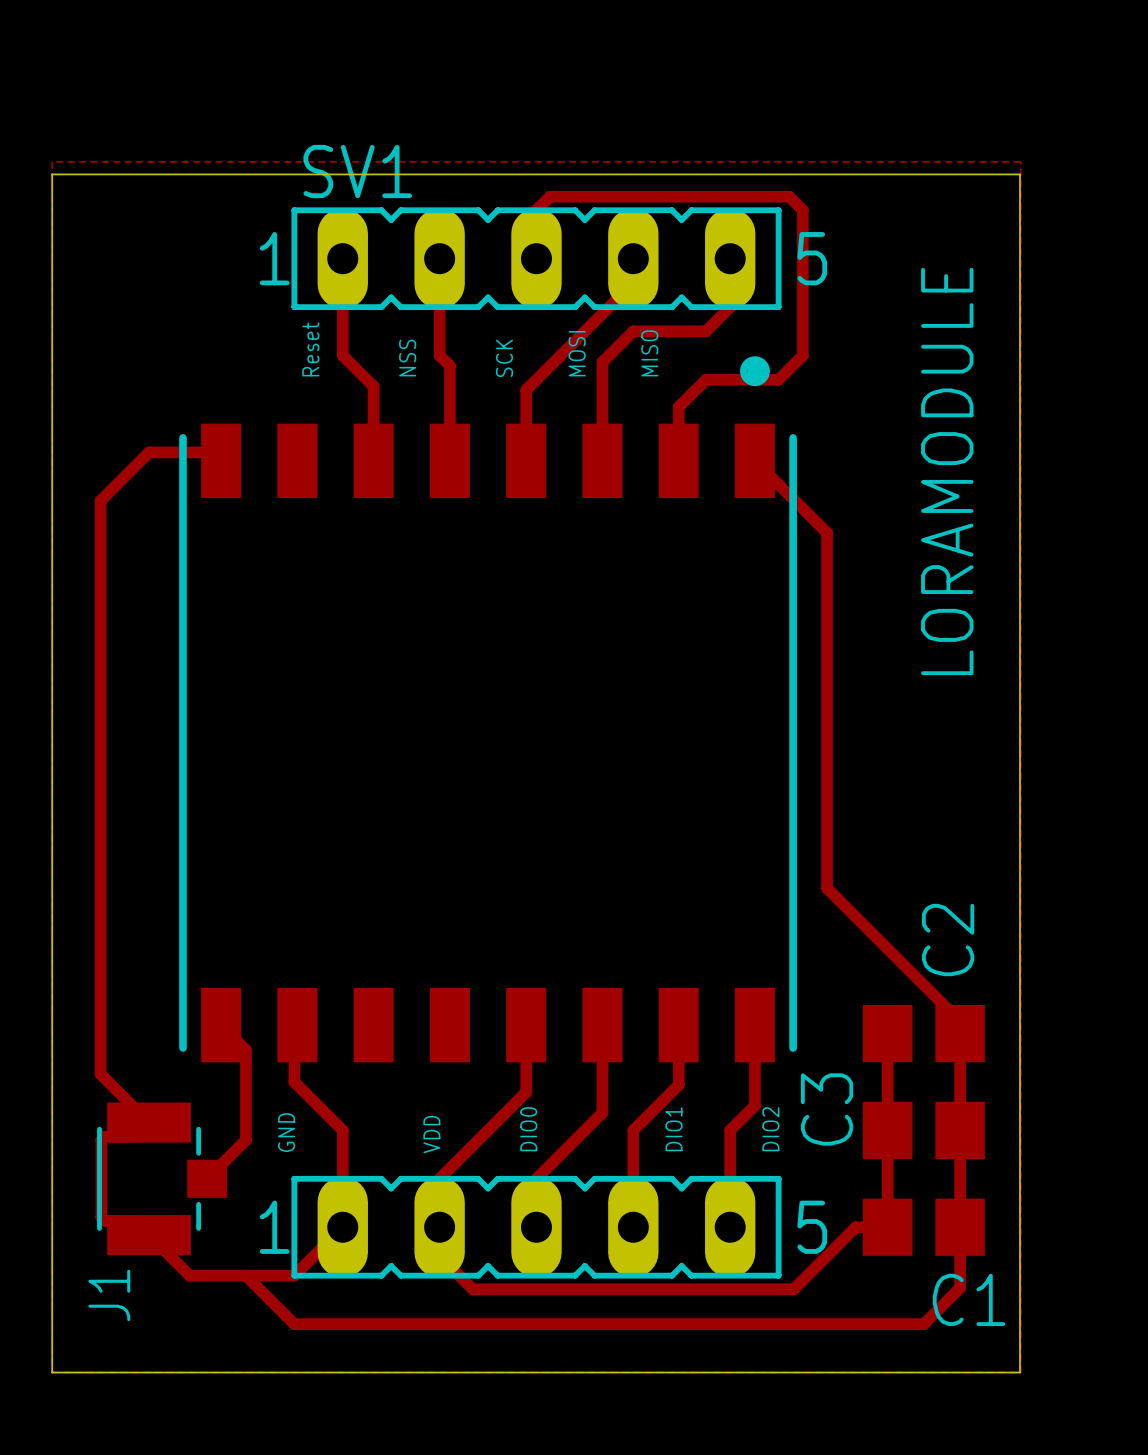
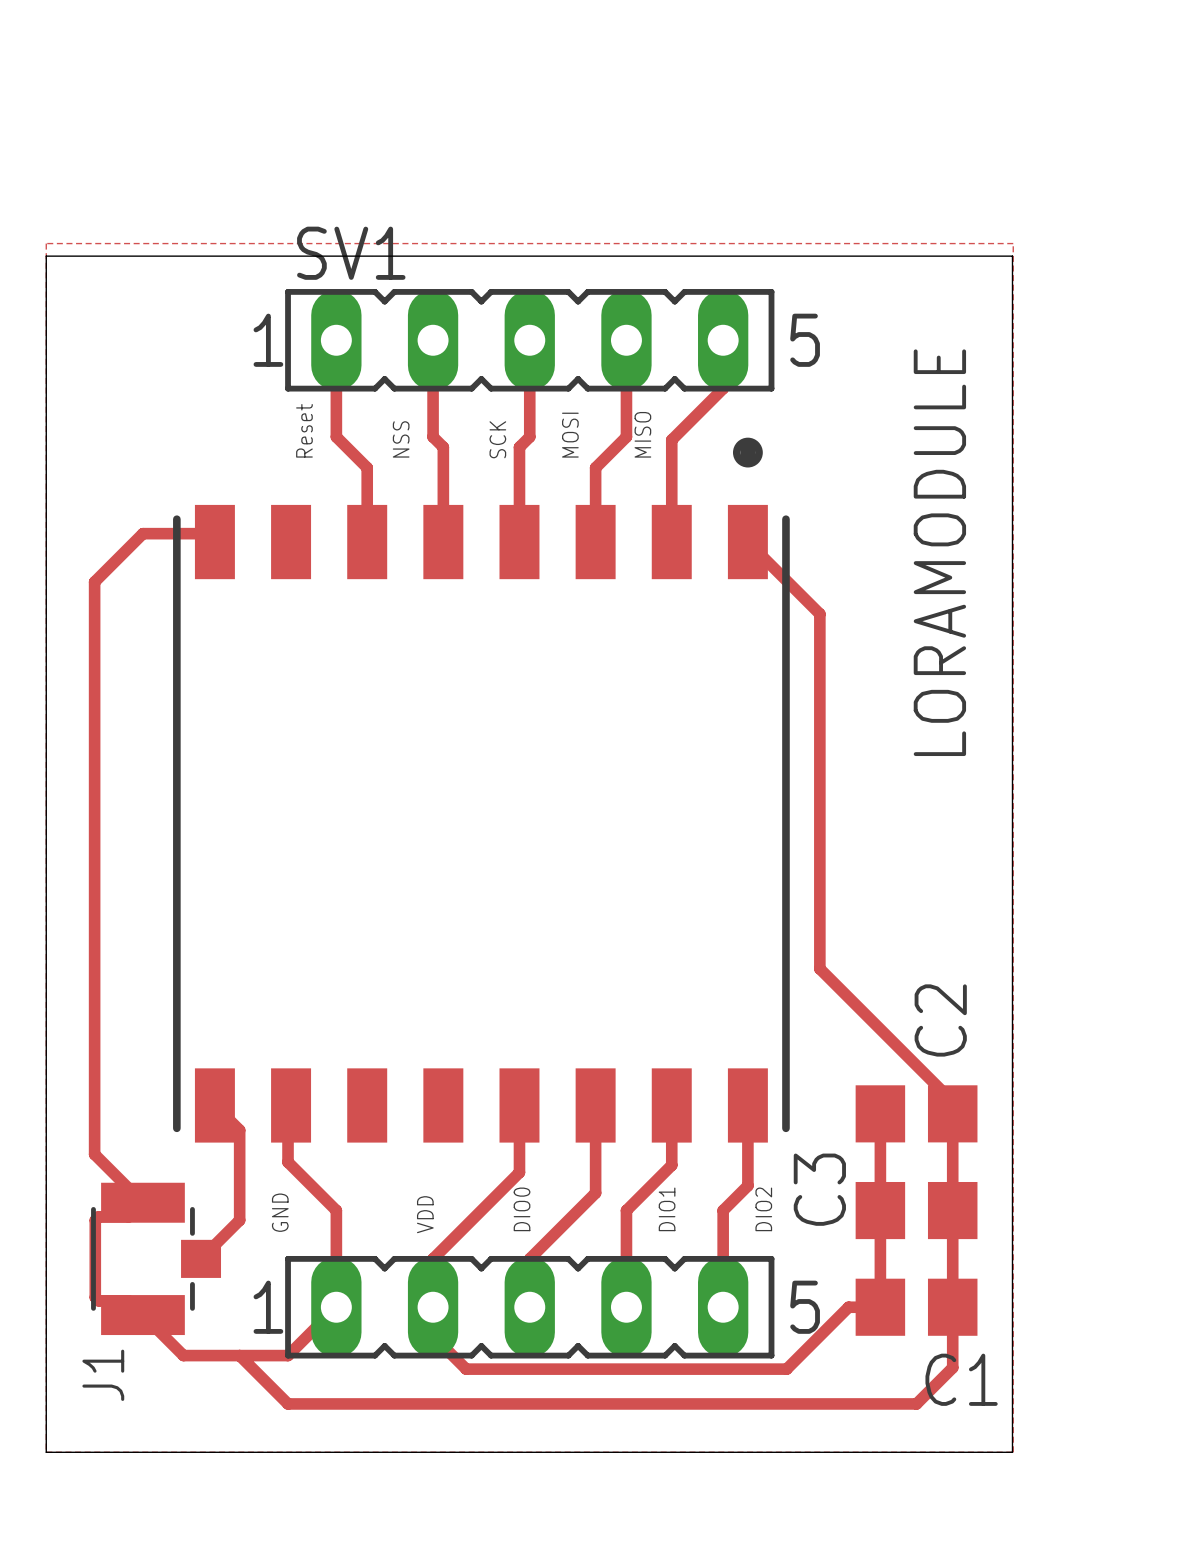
track: (536, 258) (536, 210) (550, 196) (789, 196) (802, 210) (802, 355) (778, 379) (705, 379) (678, 407) -> (529, 340) (529, 436) (519, 447) (519, 471)
track: (633, 282) (526, 390) -> (626, 364) (626, 436) (595, 467)
track: (705, 331) (633, 331) (602, 362) (602, 386) -> (698, 412) (671, 440) (671, 488)

